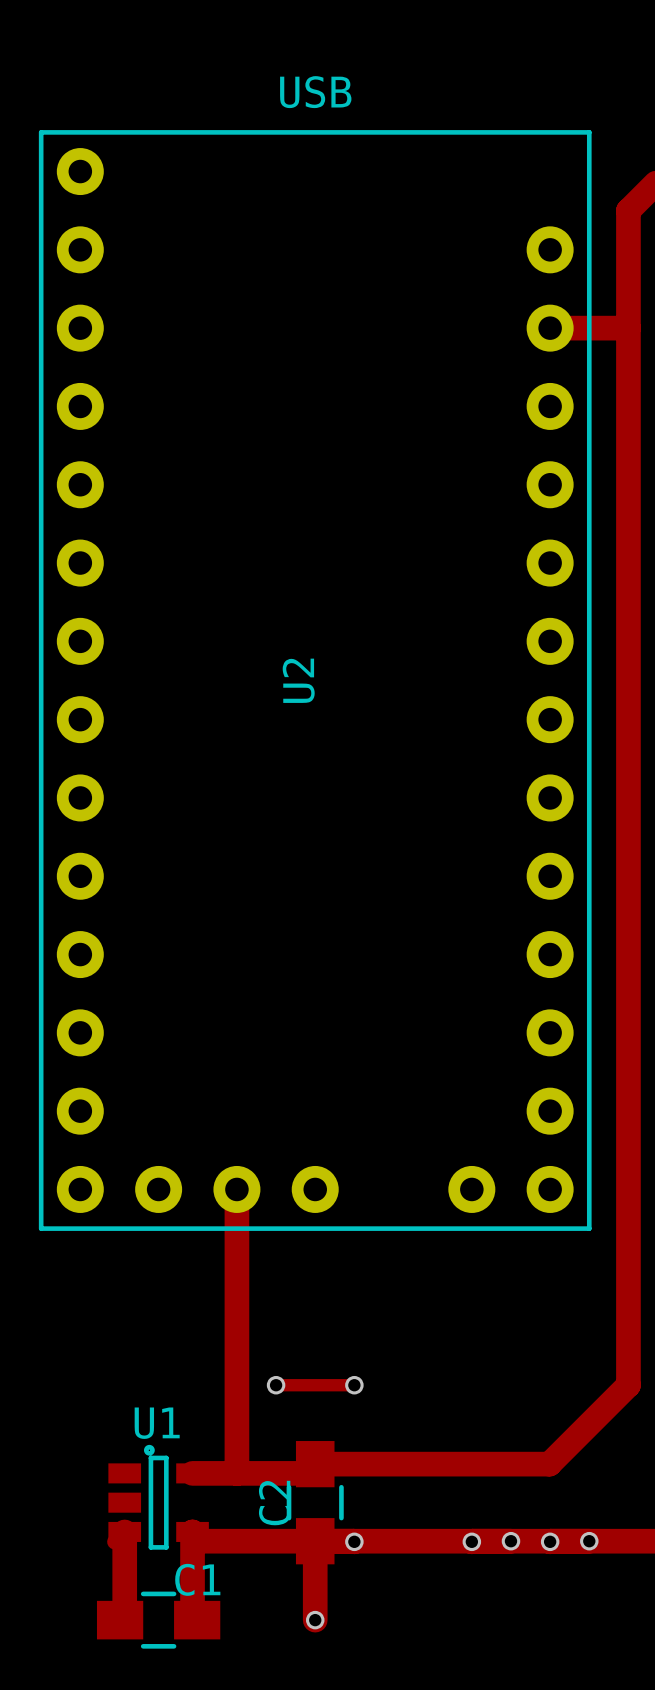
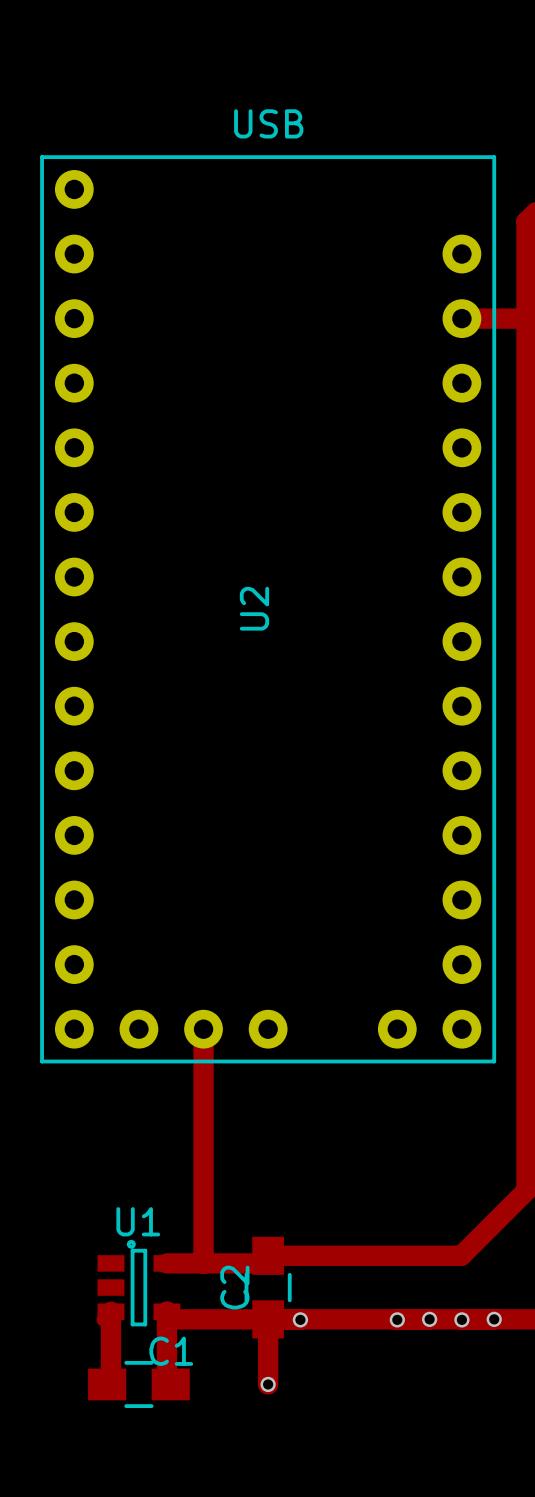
track: (276, 1385) (354, 1385) -> none
via: (276, 1385) -> none
via: (354, 1385) -> none

